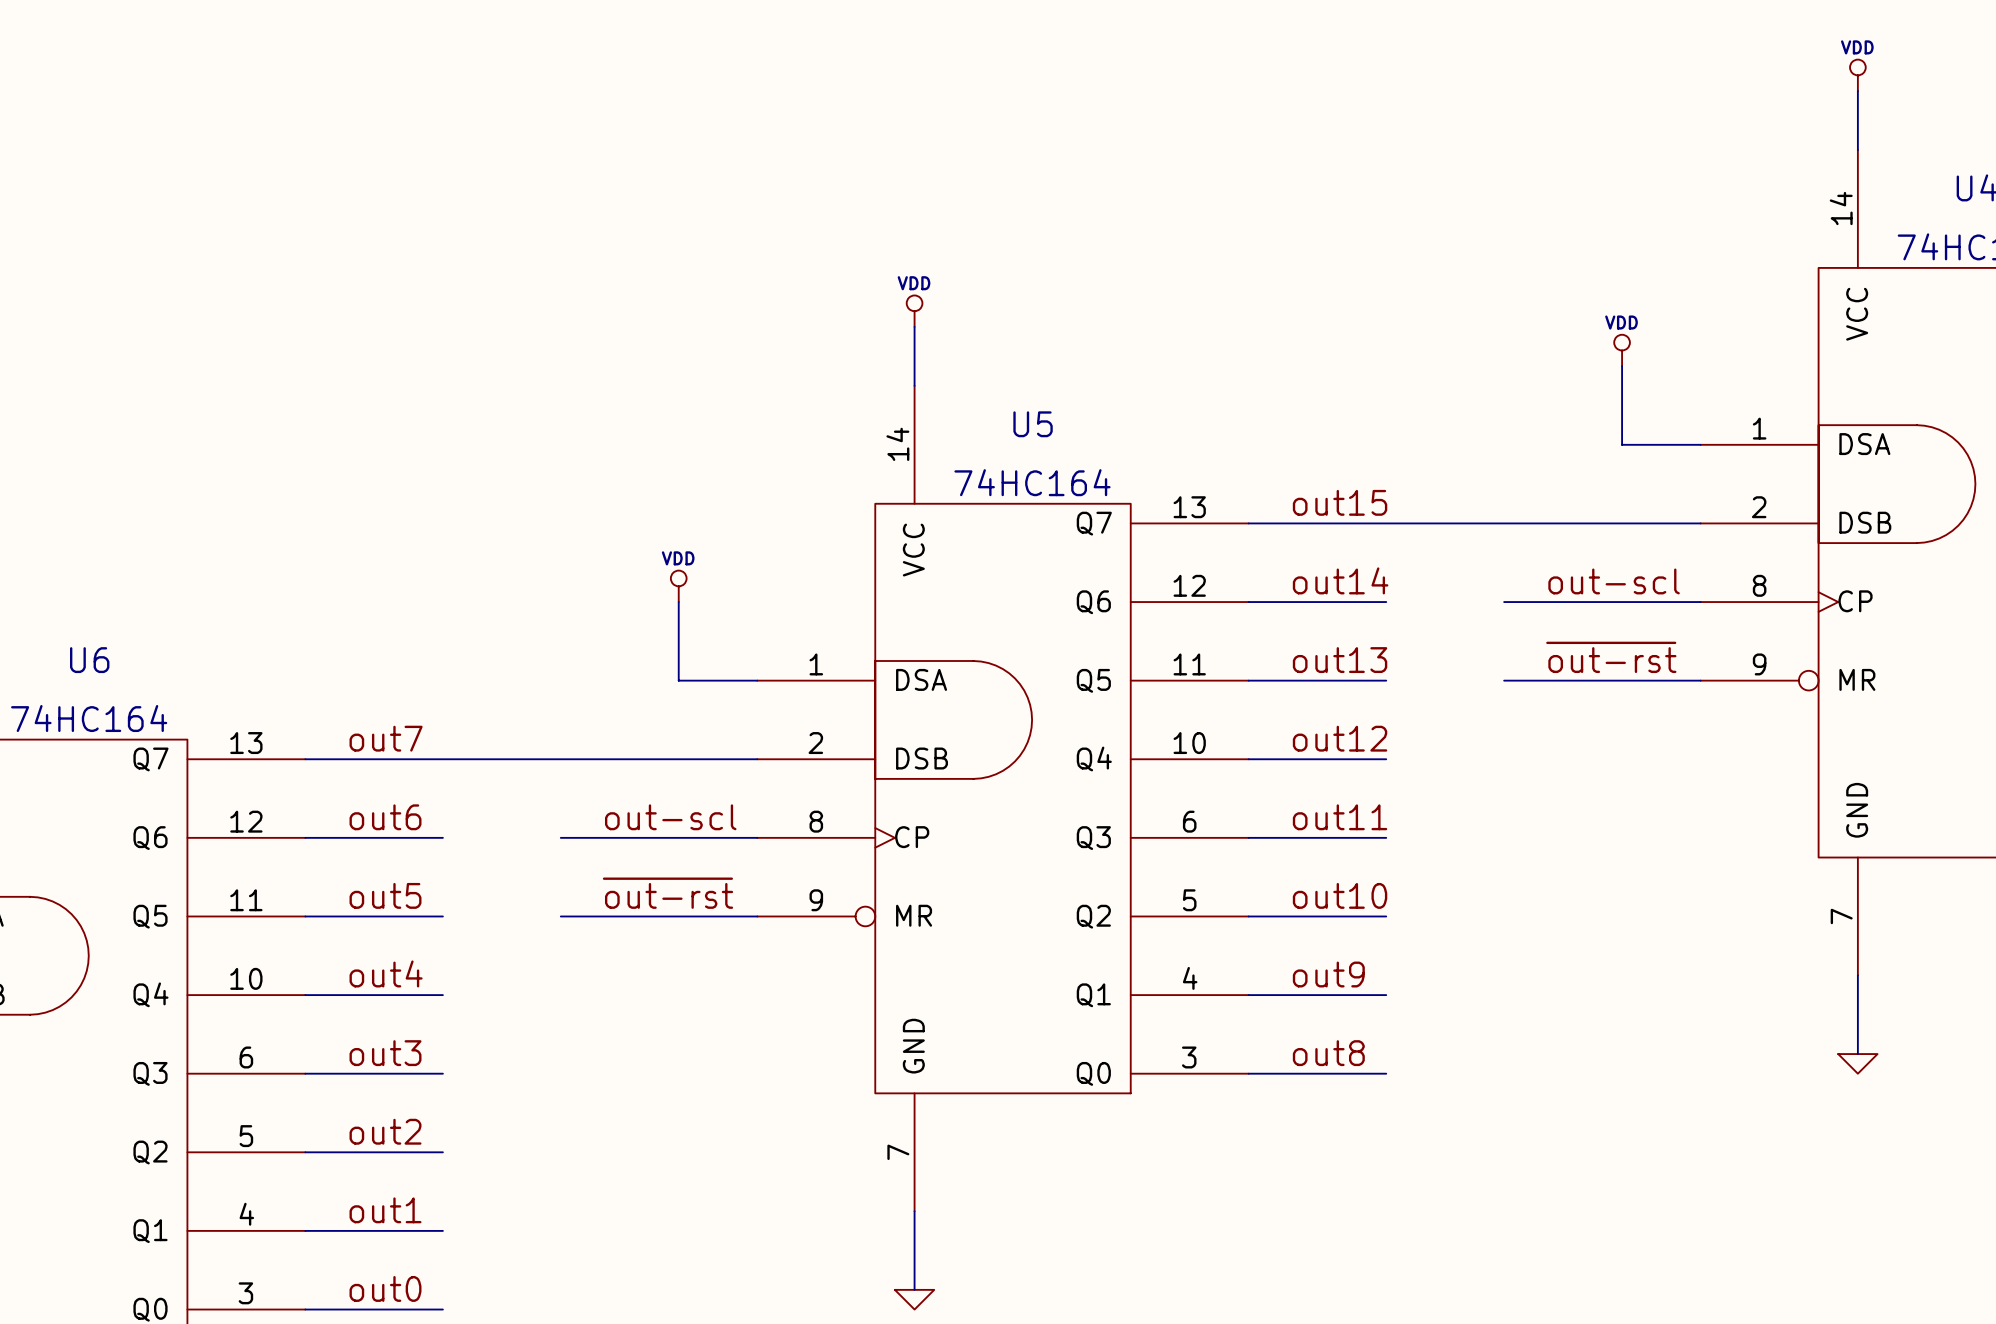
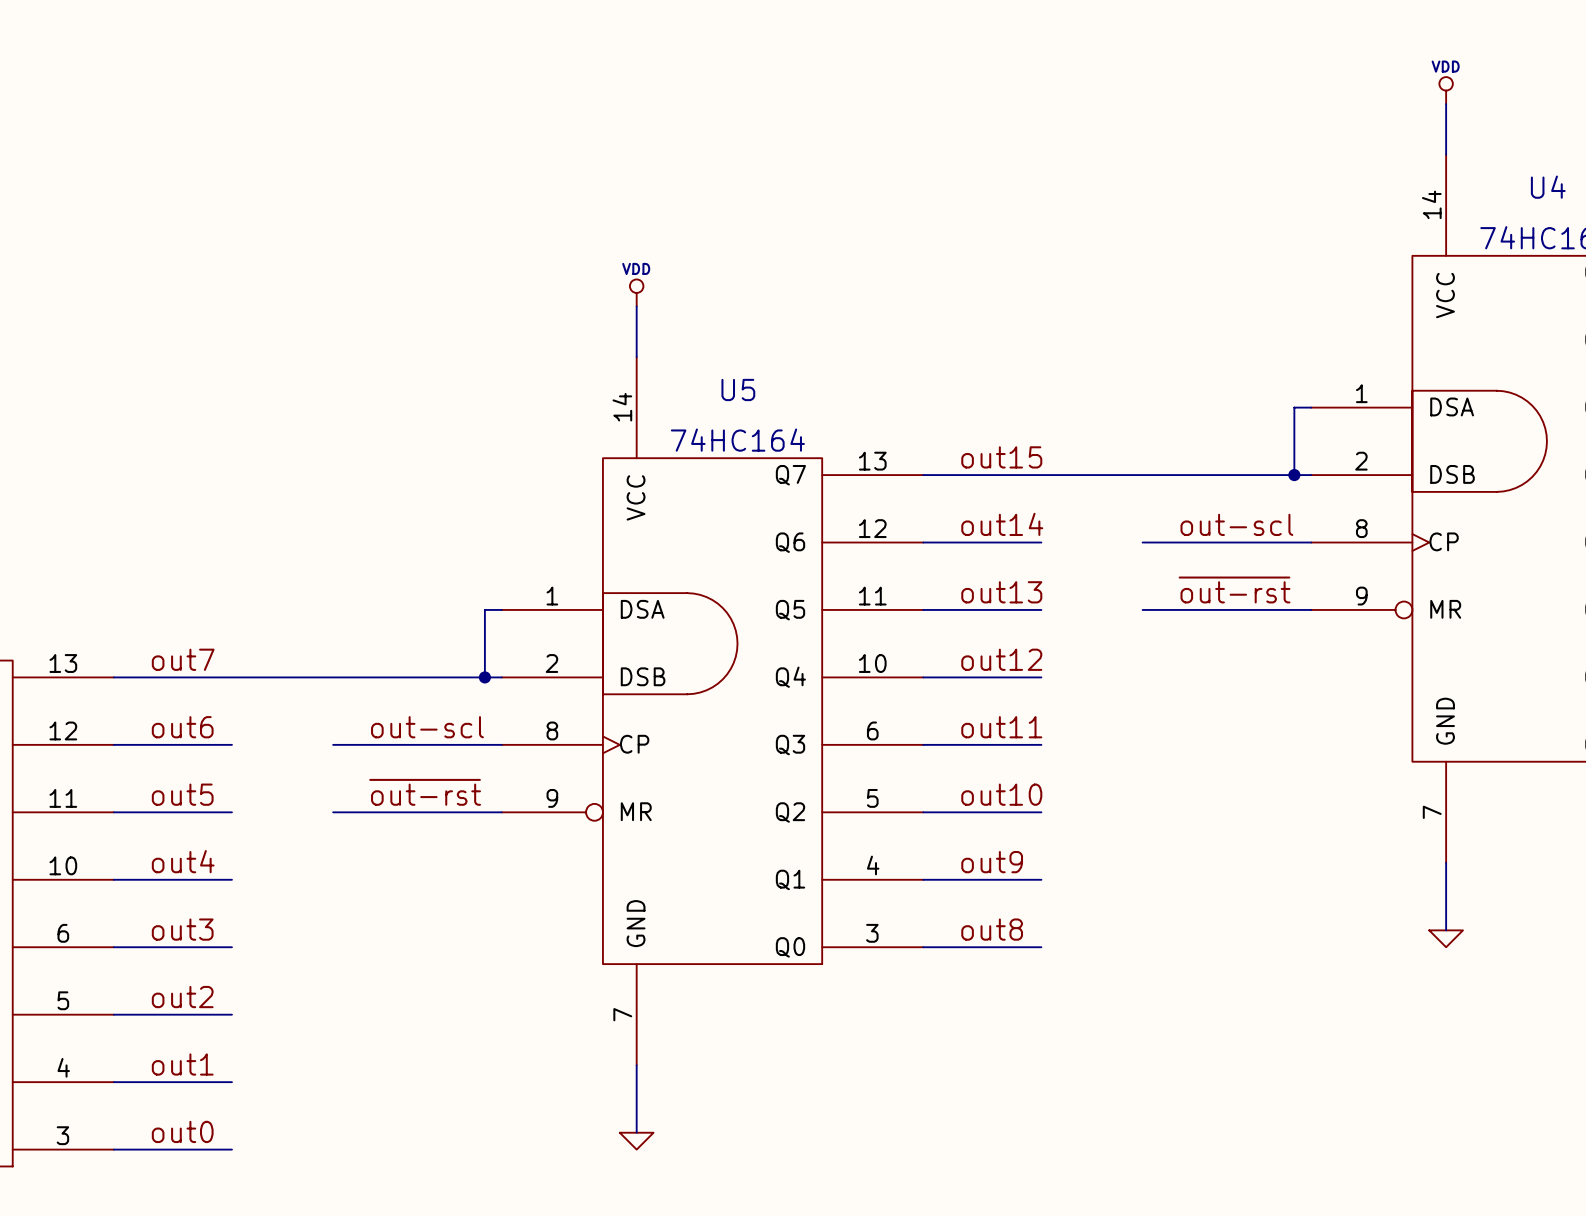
power symbol: VDD (1622, 350) -> none
wire: (1622, 366) (1622, 444) (1681, 444) -> (1294, 475) (1294, 407)
junction: none -> (1294, 475)
power symbol: VDD (678, 586) -> none
wire: (678, 602) (678, 680) (737, 680) -> (484, 677) (484, 609)
junction: none -> (484, 677)

